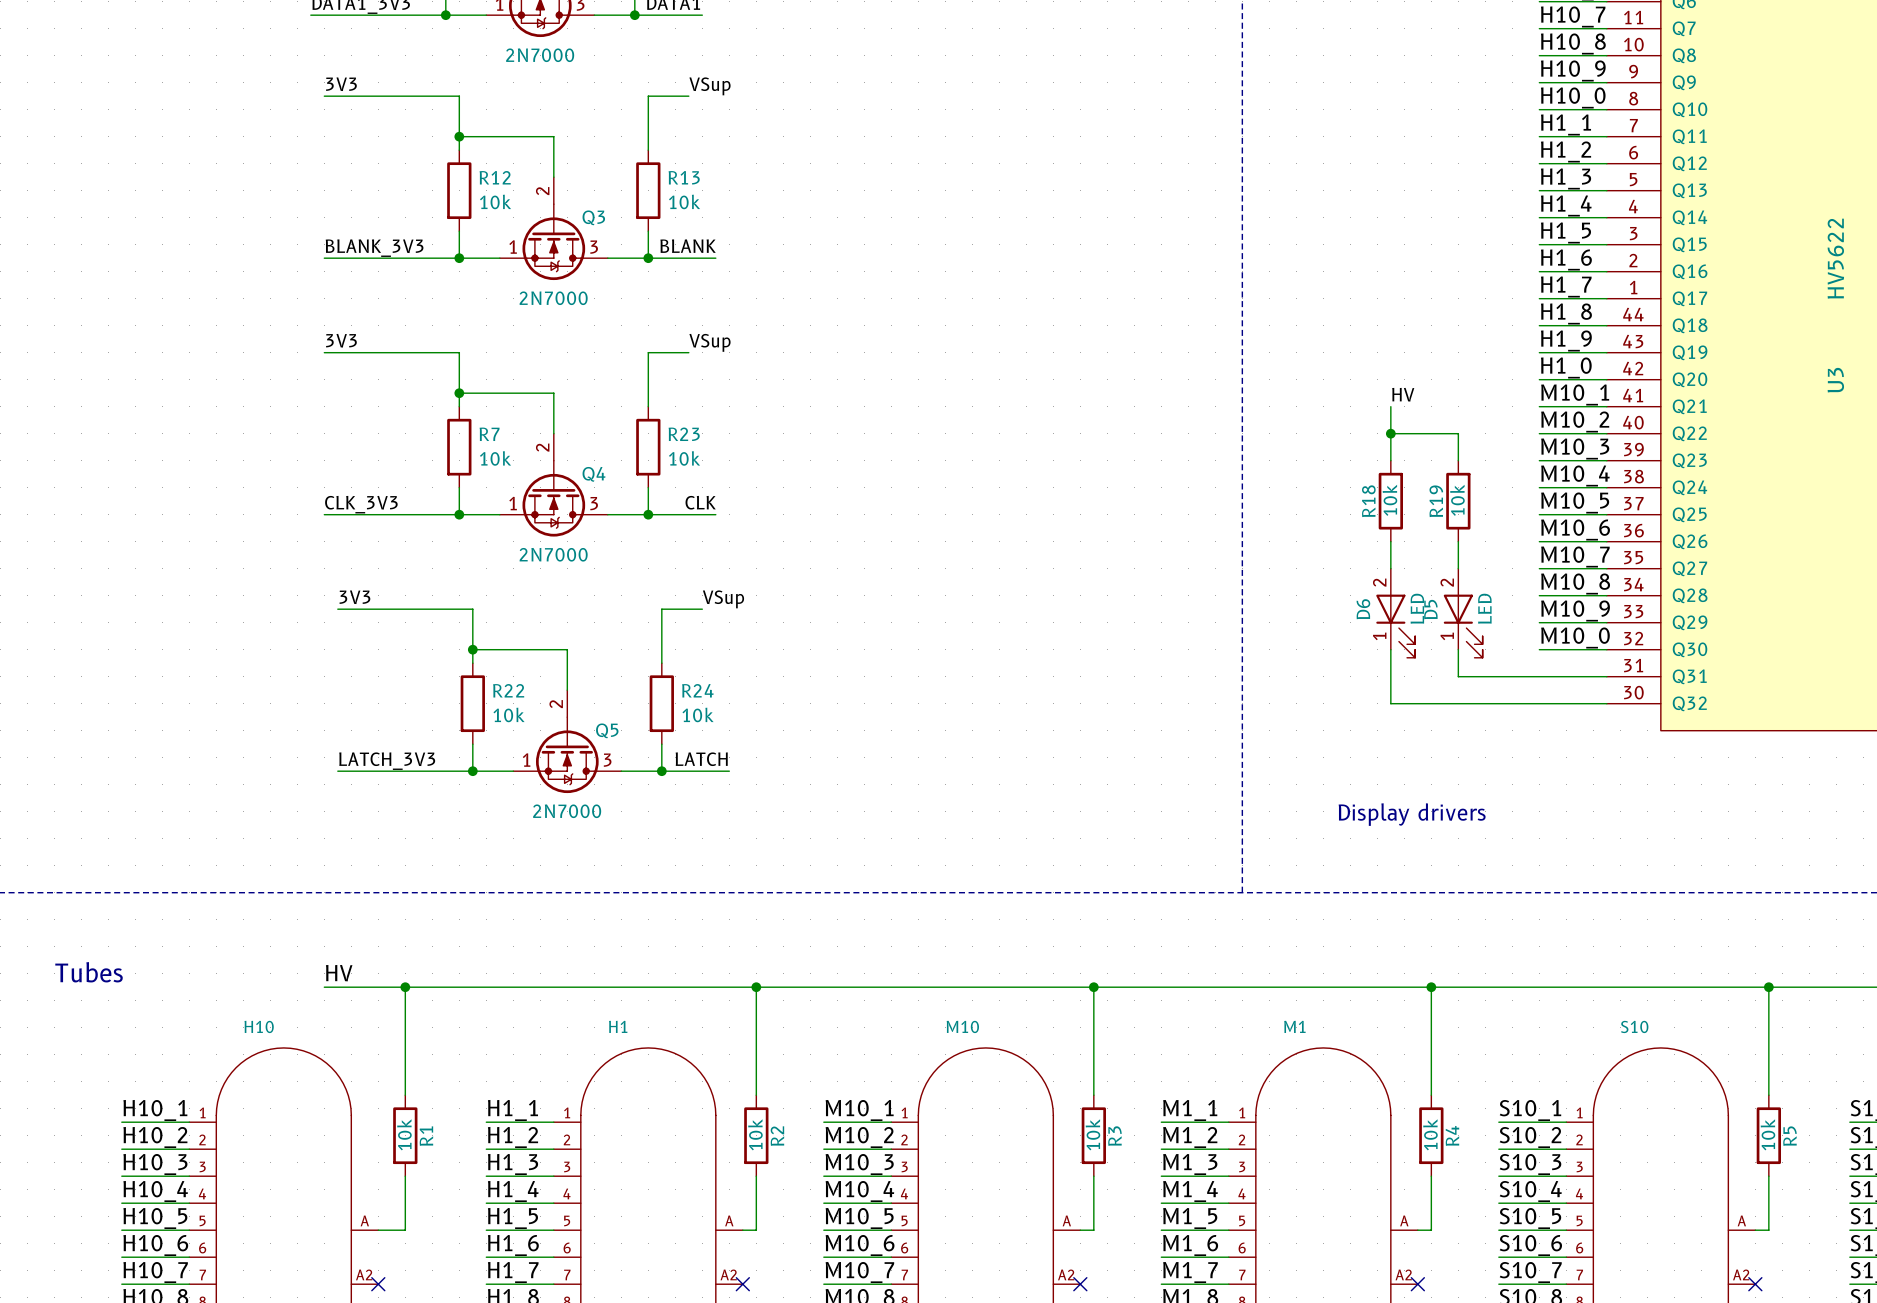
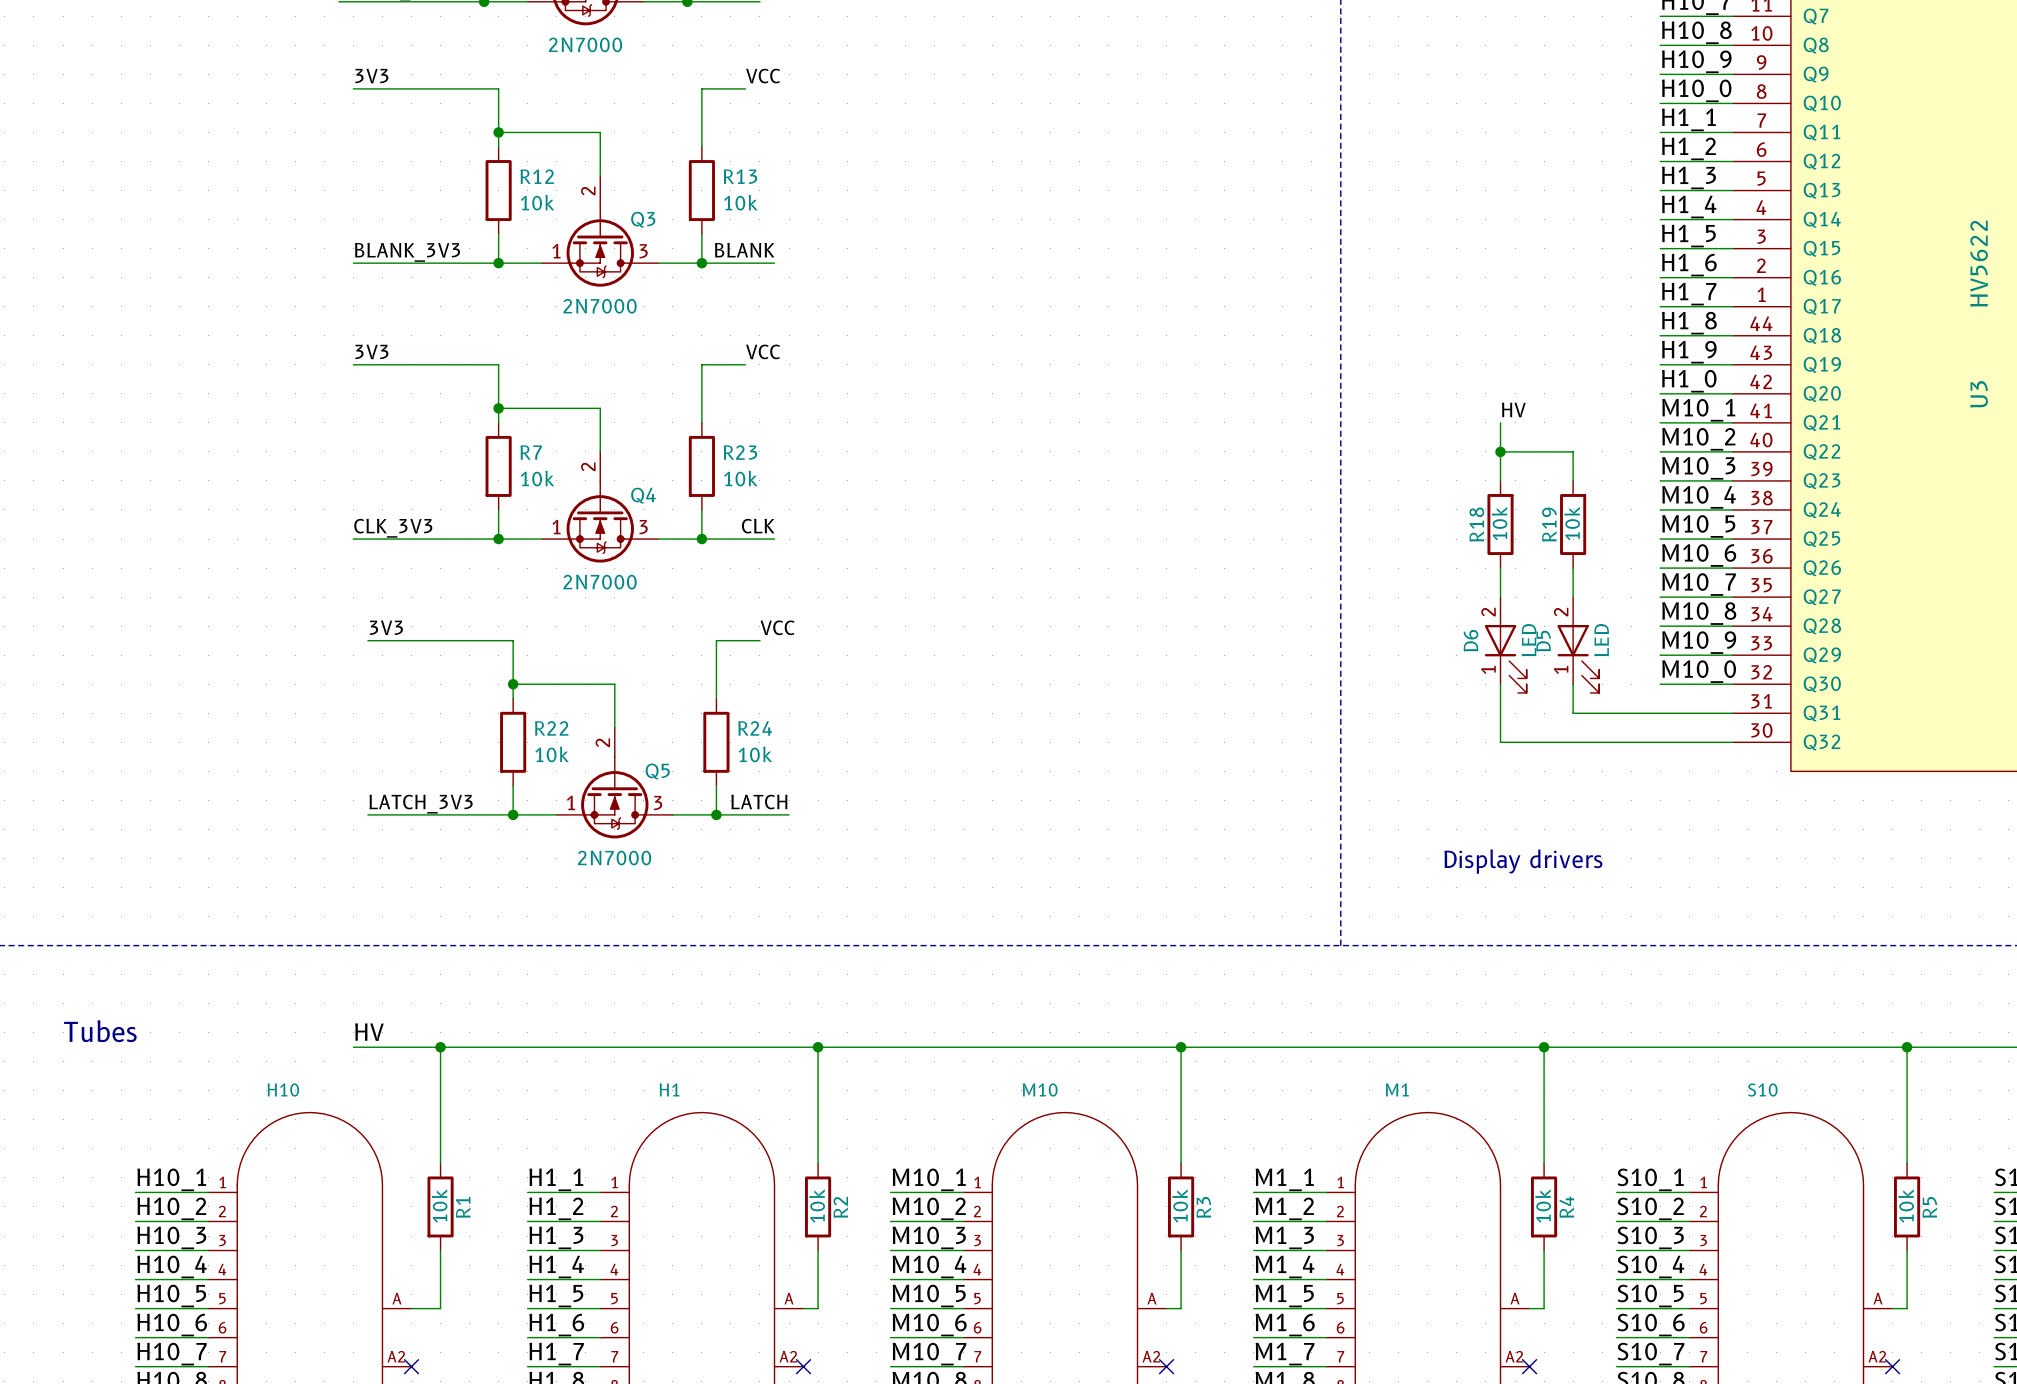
label: VSup (709, 86) -> VCC (763, 76)
label: VSup (709, 342) -> VCC (763, 351)
label: VSup (723, 599) -> VCC (777, 627)

